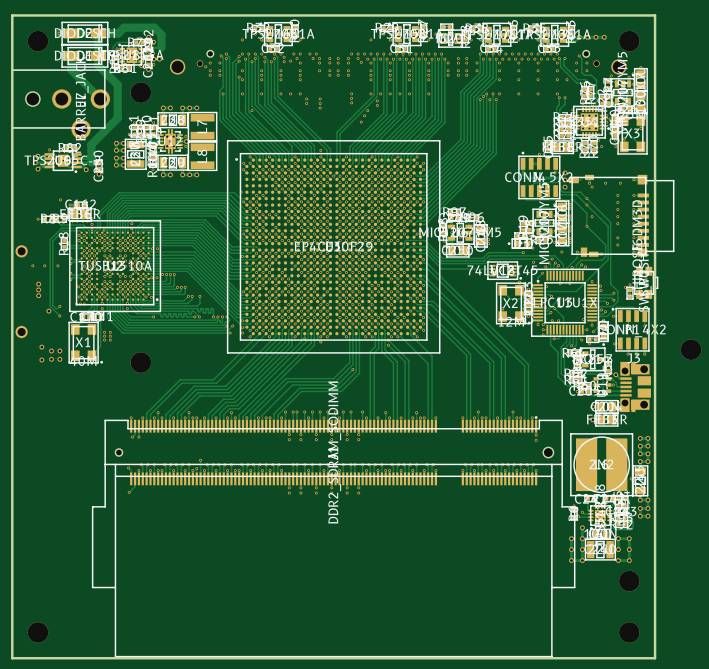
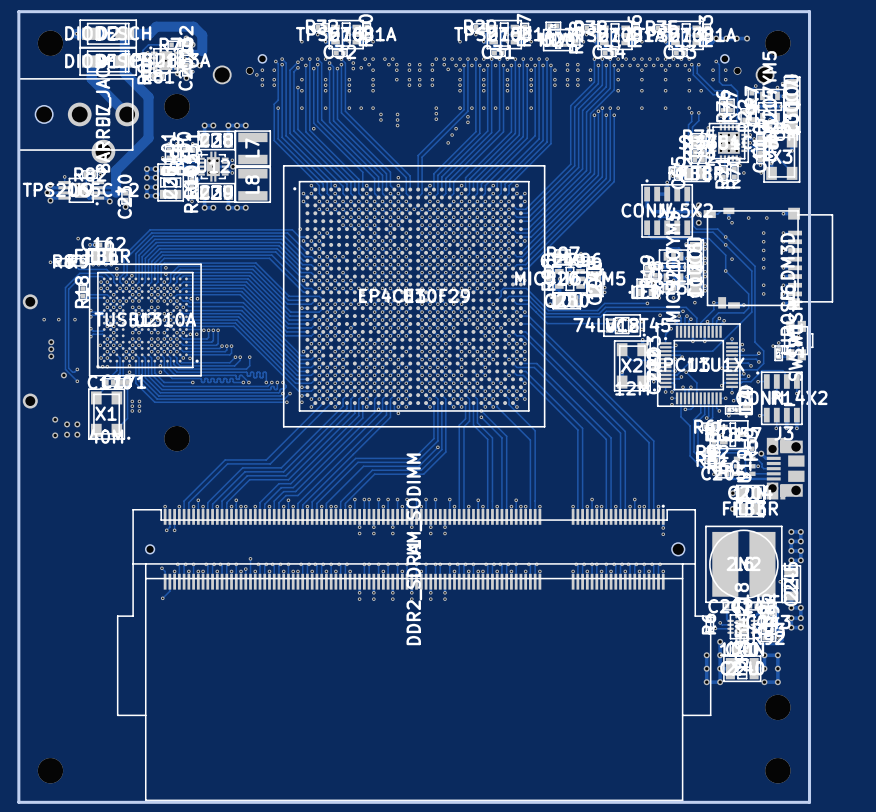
part: (691, 349) -> none

